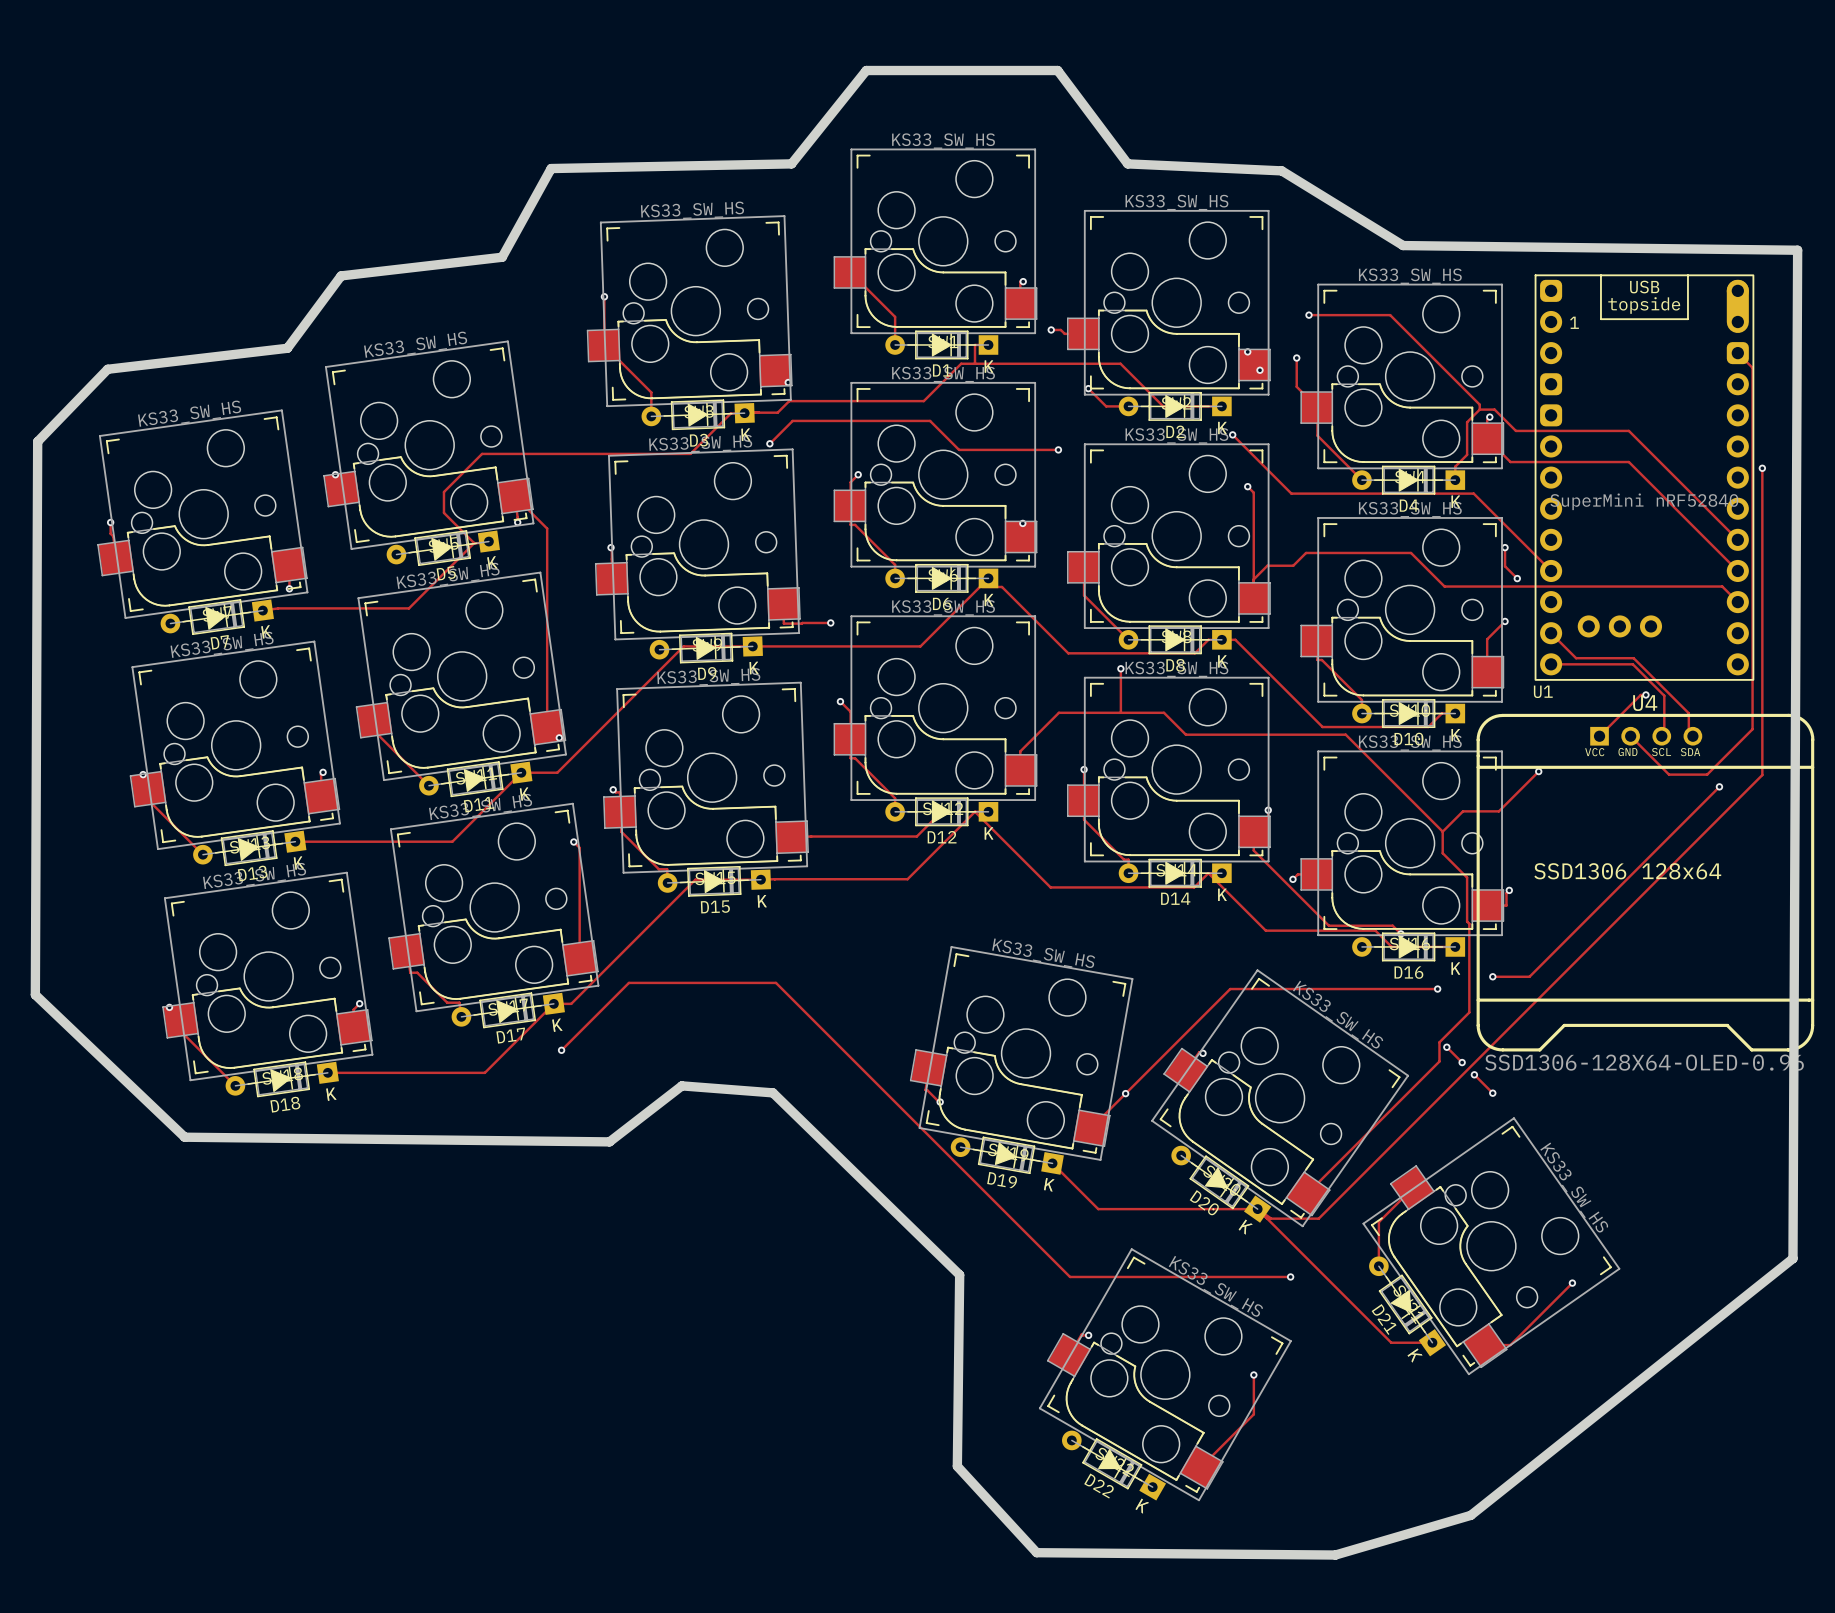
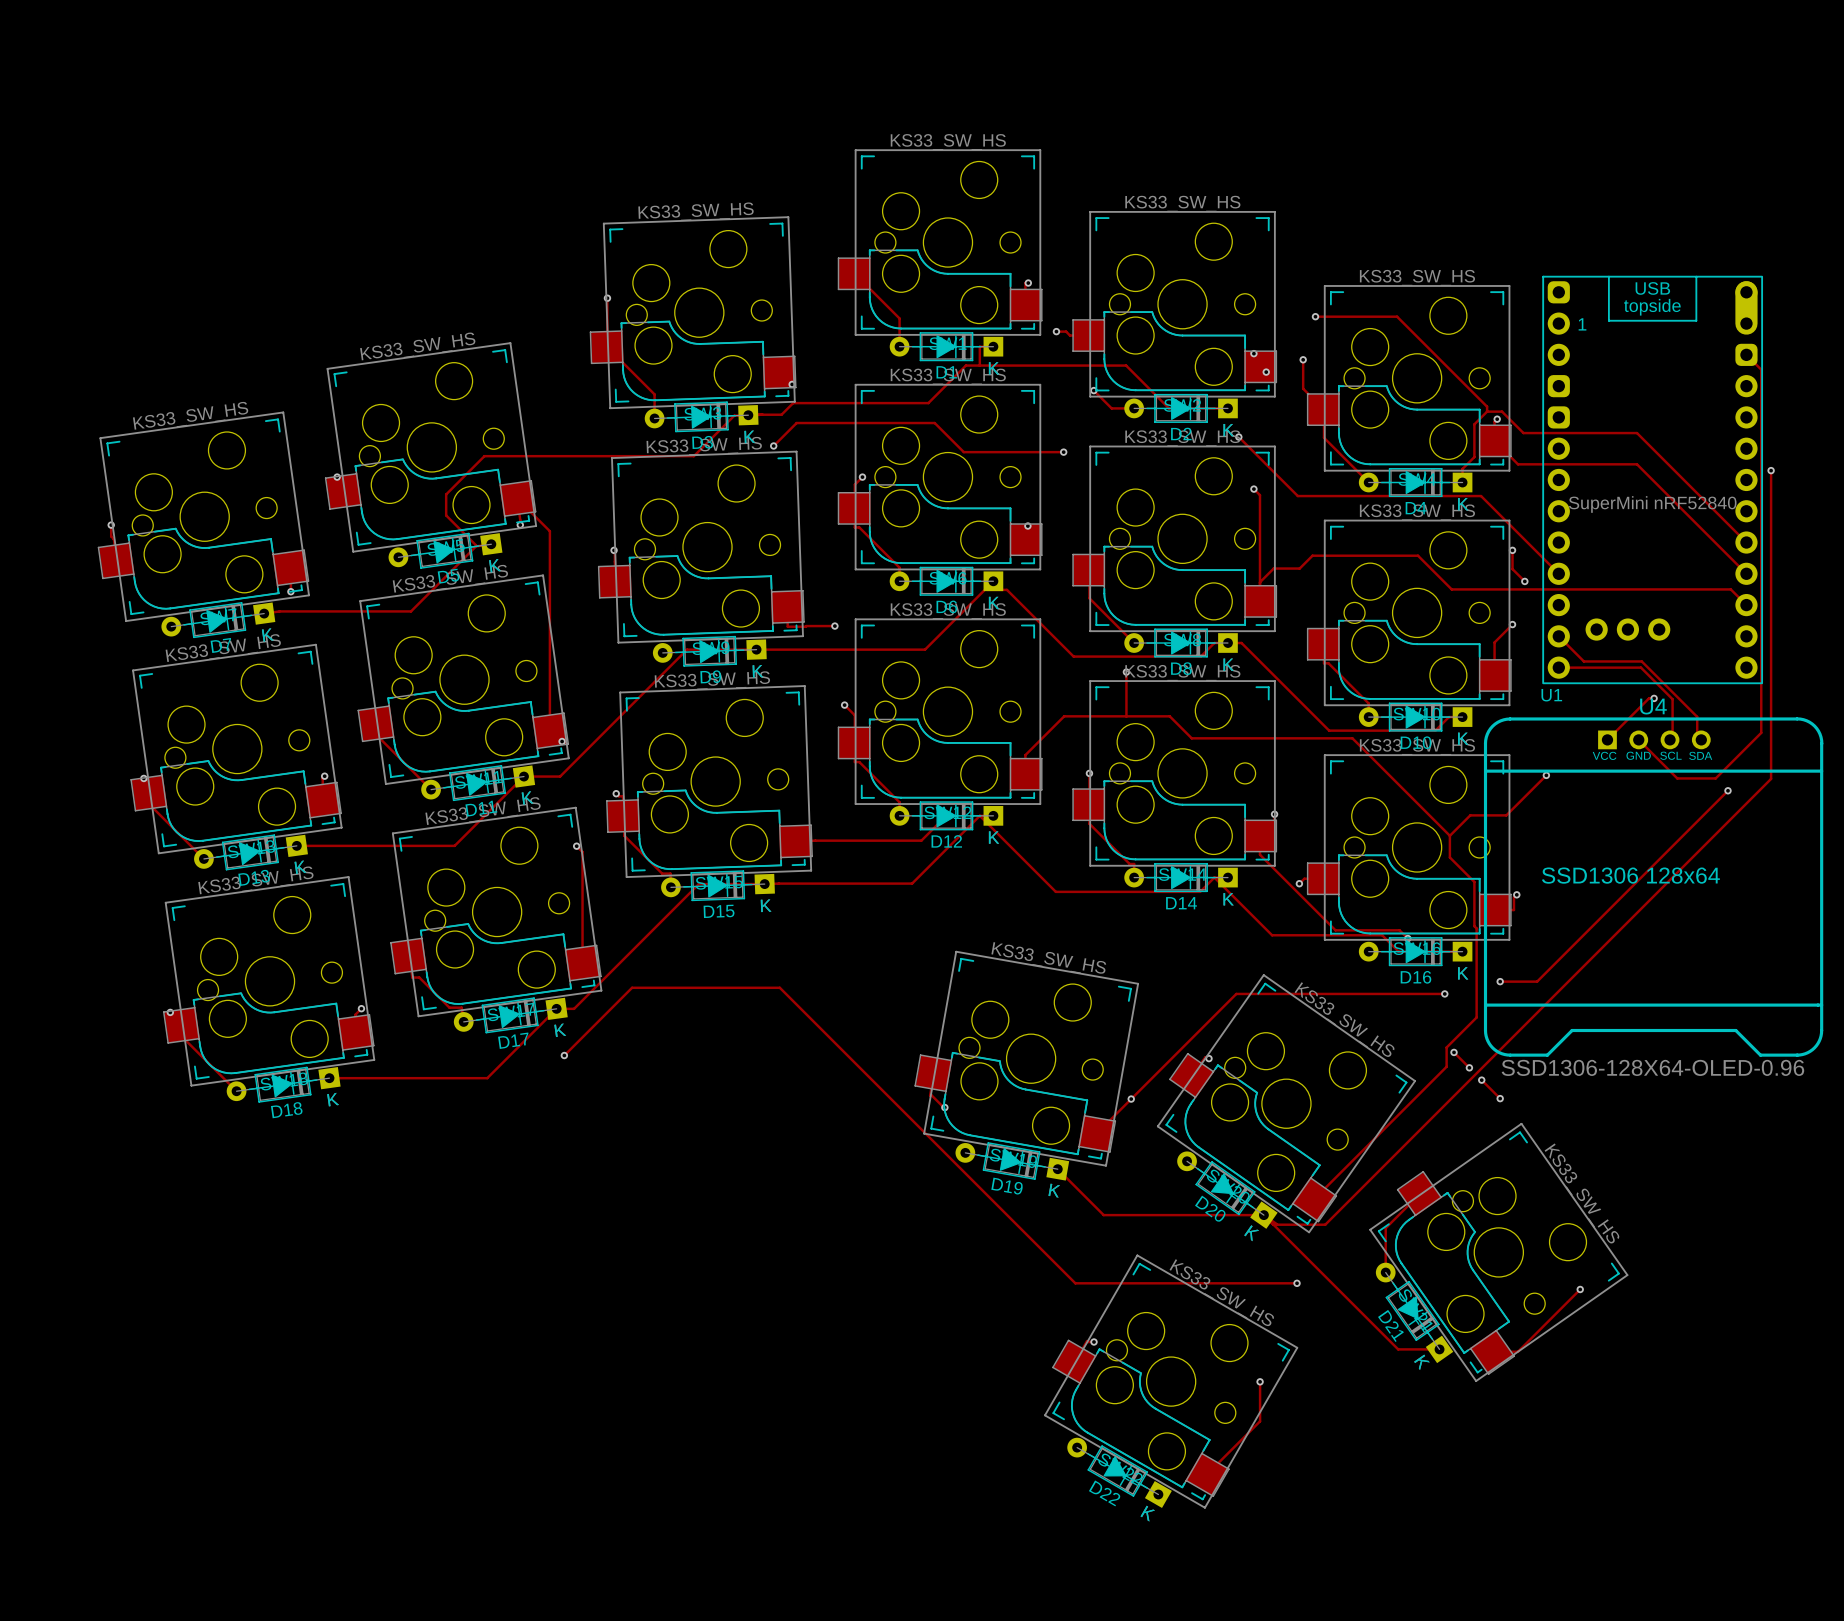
board edge: (866, 70) (791, 163) (551, 168) (502, 257) (341, 275) (287, 348) (107, 369) (37, 441) (35, 994) (184, 1137) (609, 1141) (681, 1085) (772, 1092) (959, 1274) (957, 1466) (1036, 1552) (1335, 1555) (1470, 1515) (1792, 1258) (1797, 250) (1403, 245) (1281, 170) (1127, 163) (1057, 70) (866, 70) -> none

